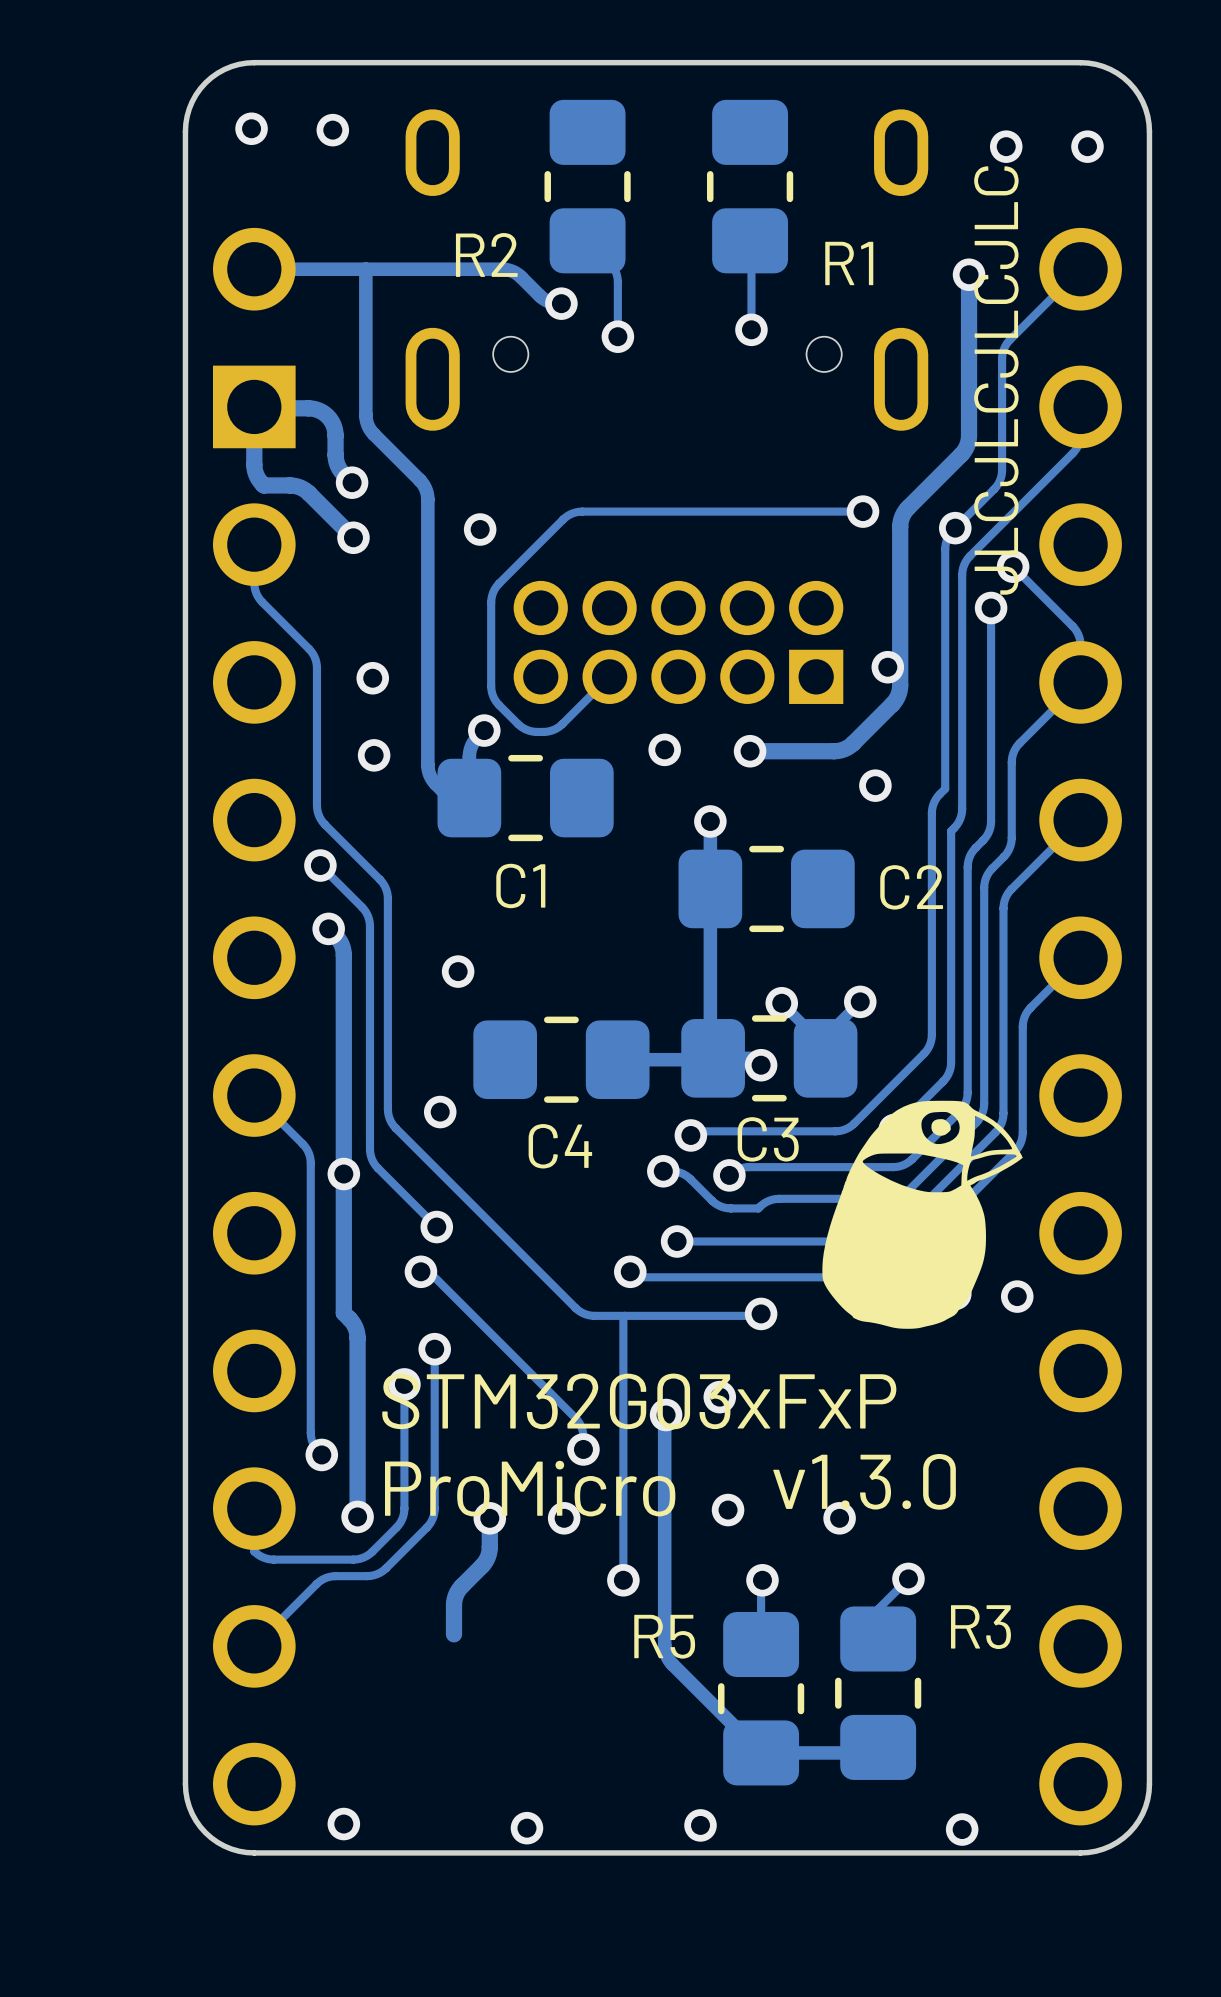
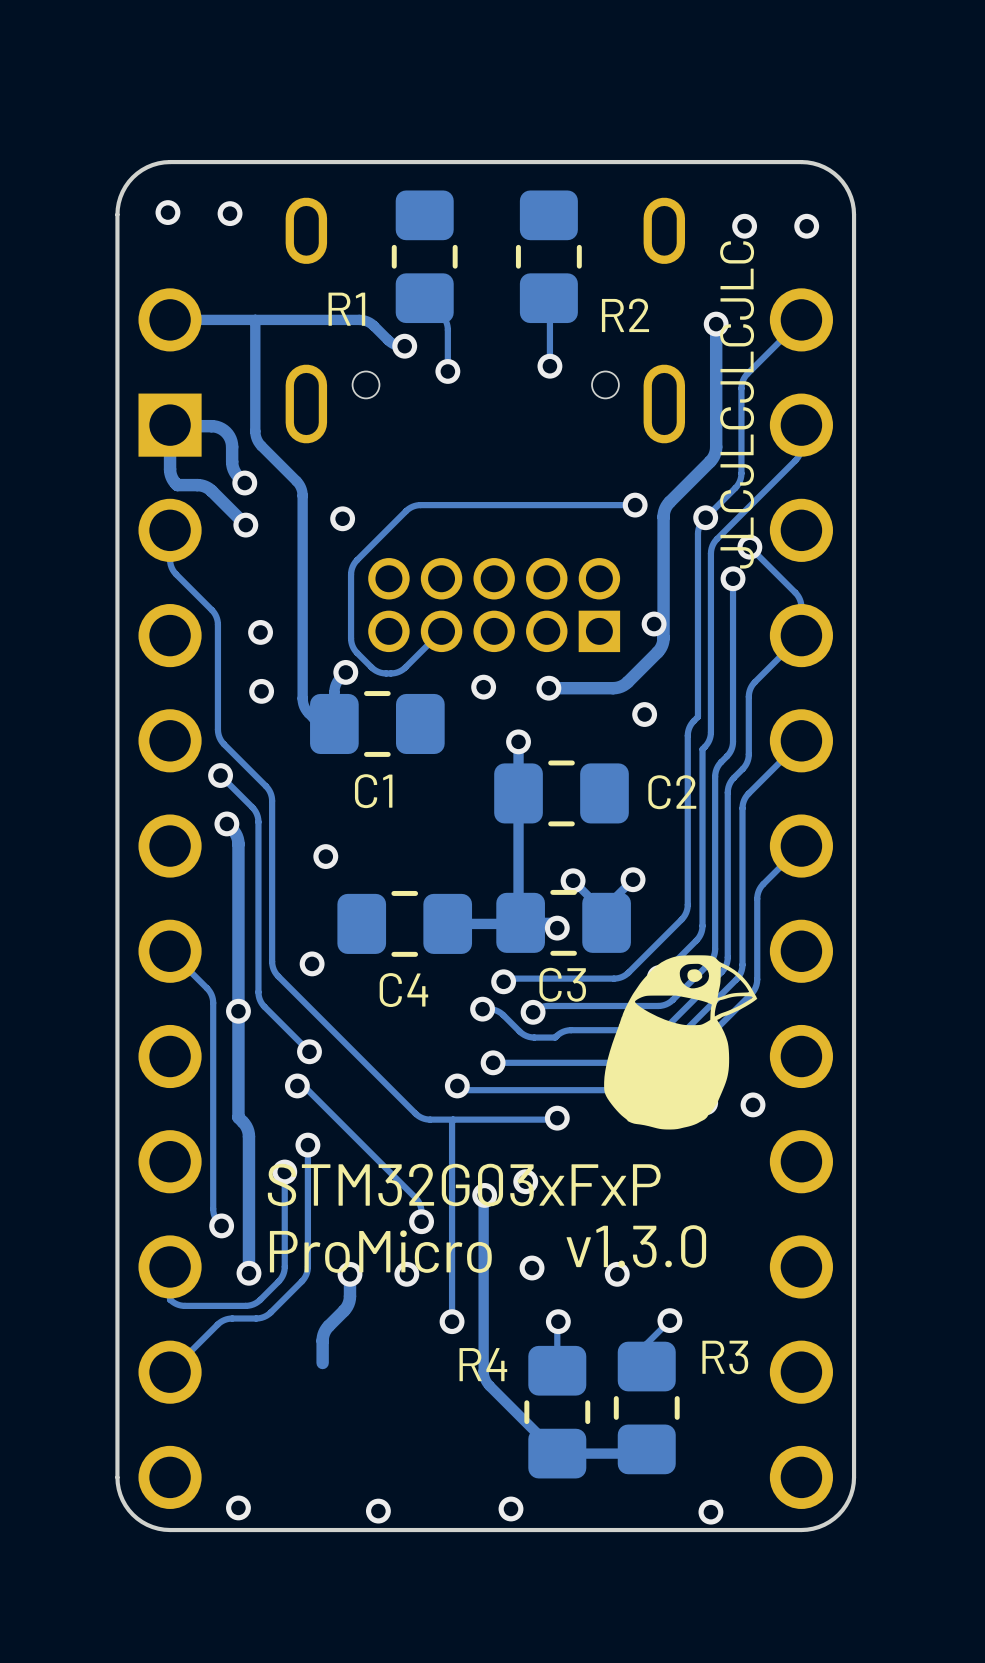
R2 name: R2 (486, 254) -> R1 (346, 309)
R1 name: R1 (849, 263) -> R2 (625, 315)
R5 name: R5 (664, 1636) -> R4 (483, 1364)

